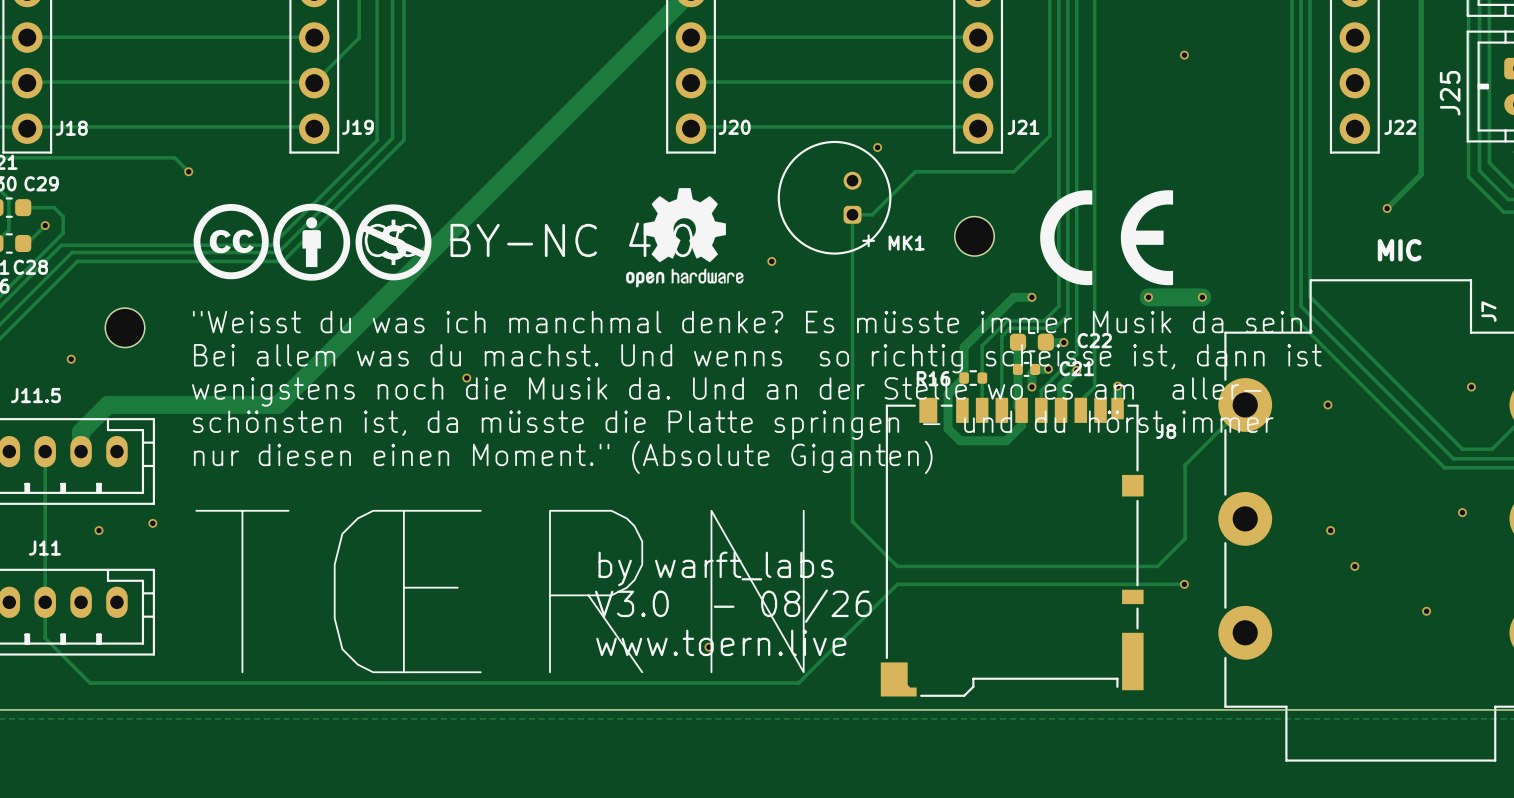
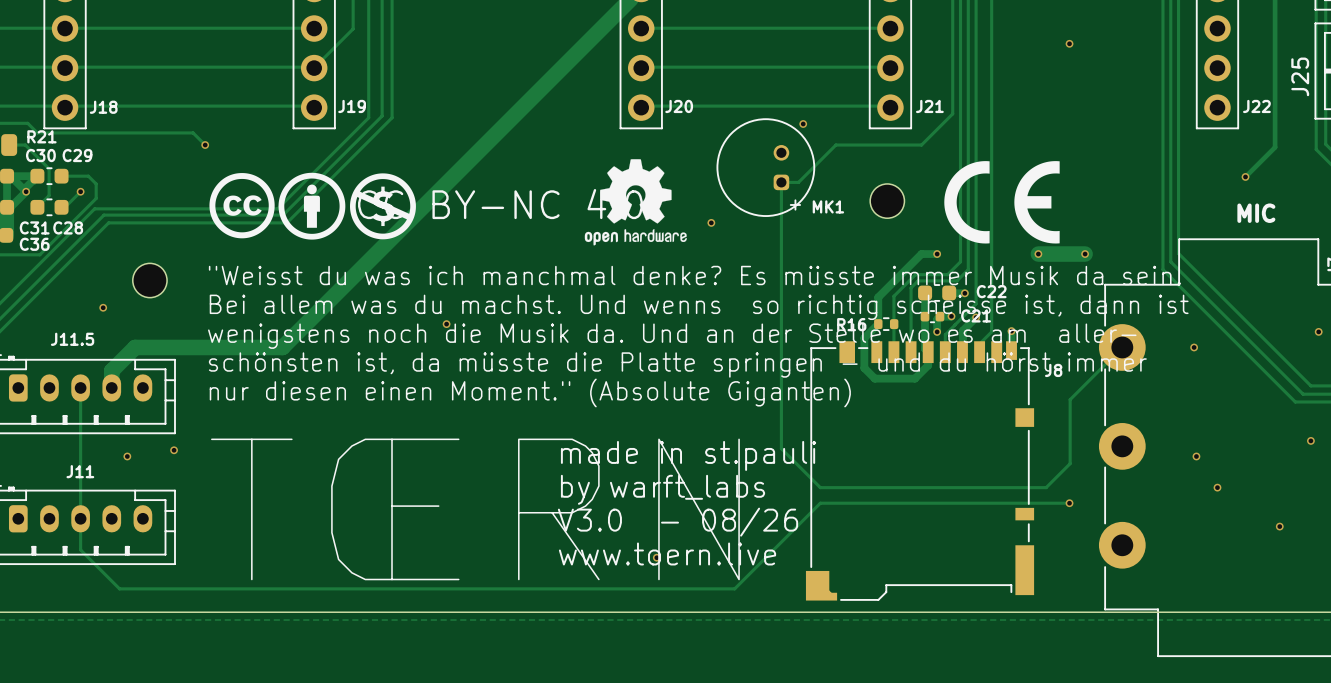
text: none -> made in st.pauli (688, 455)

